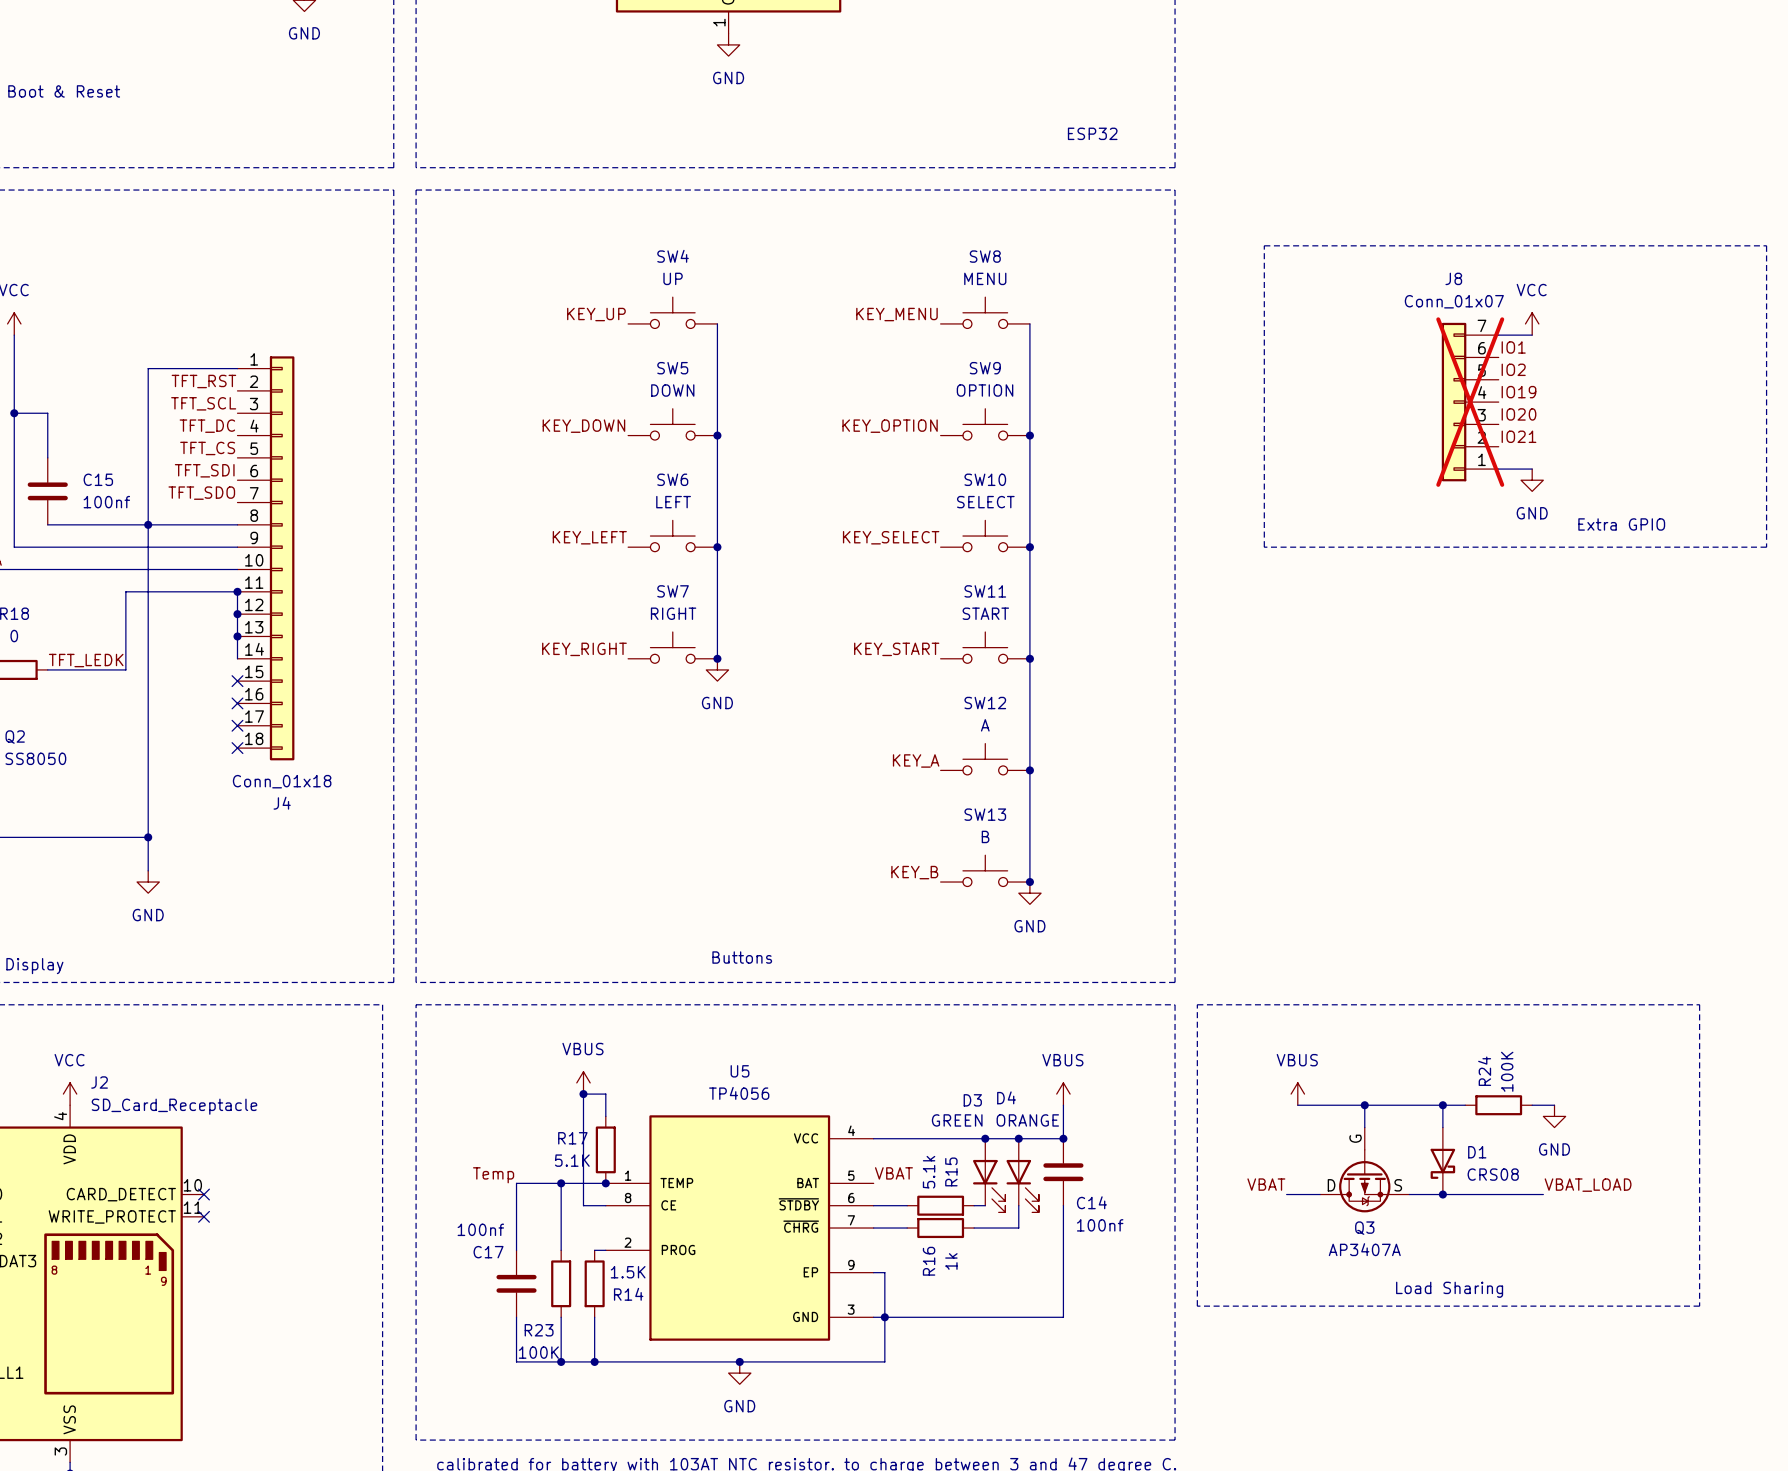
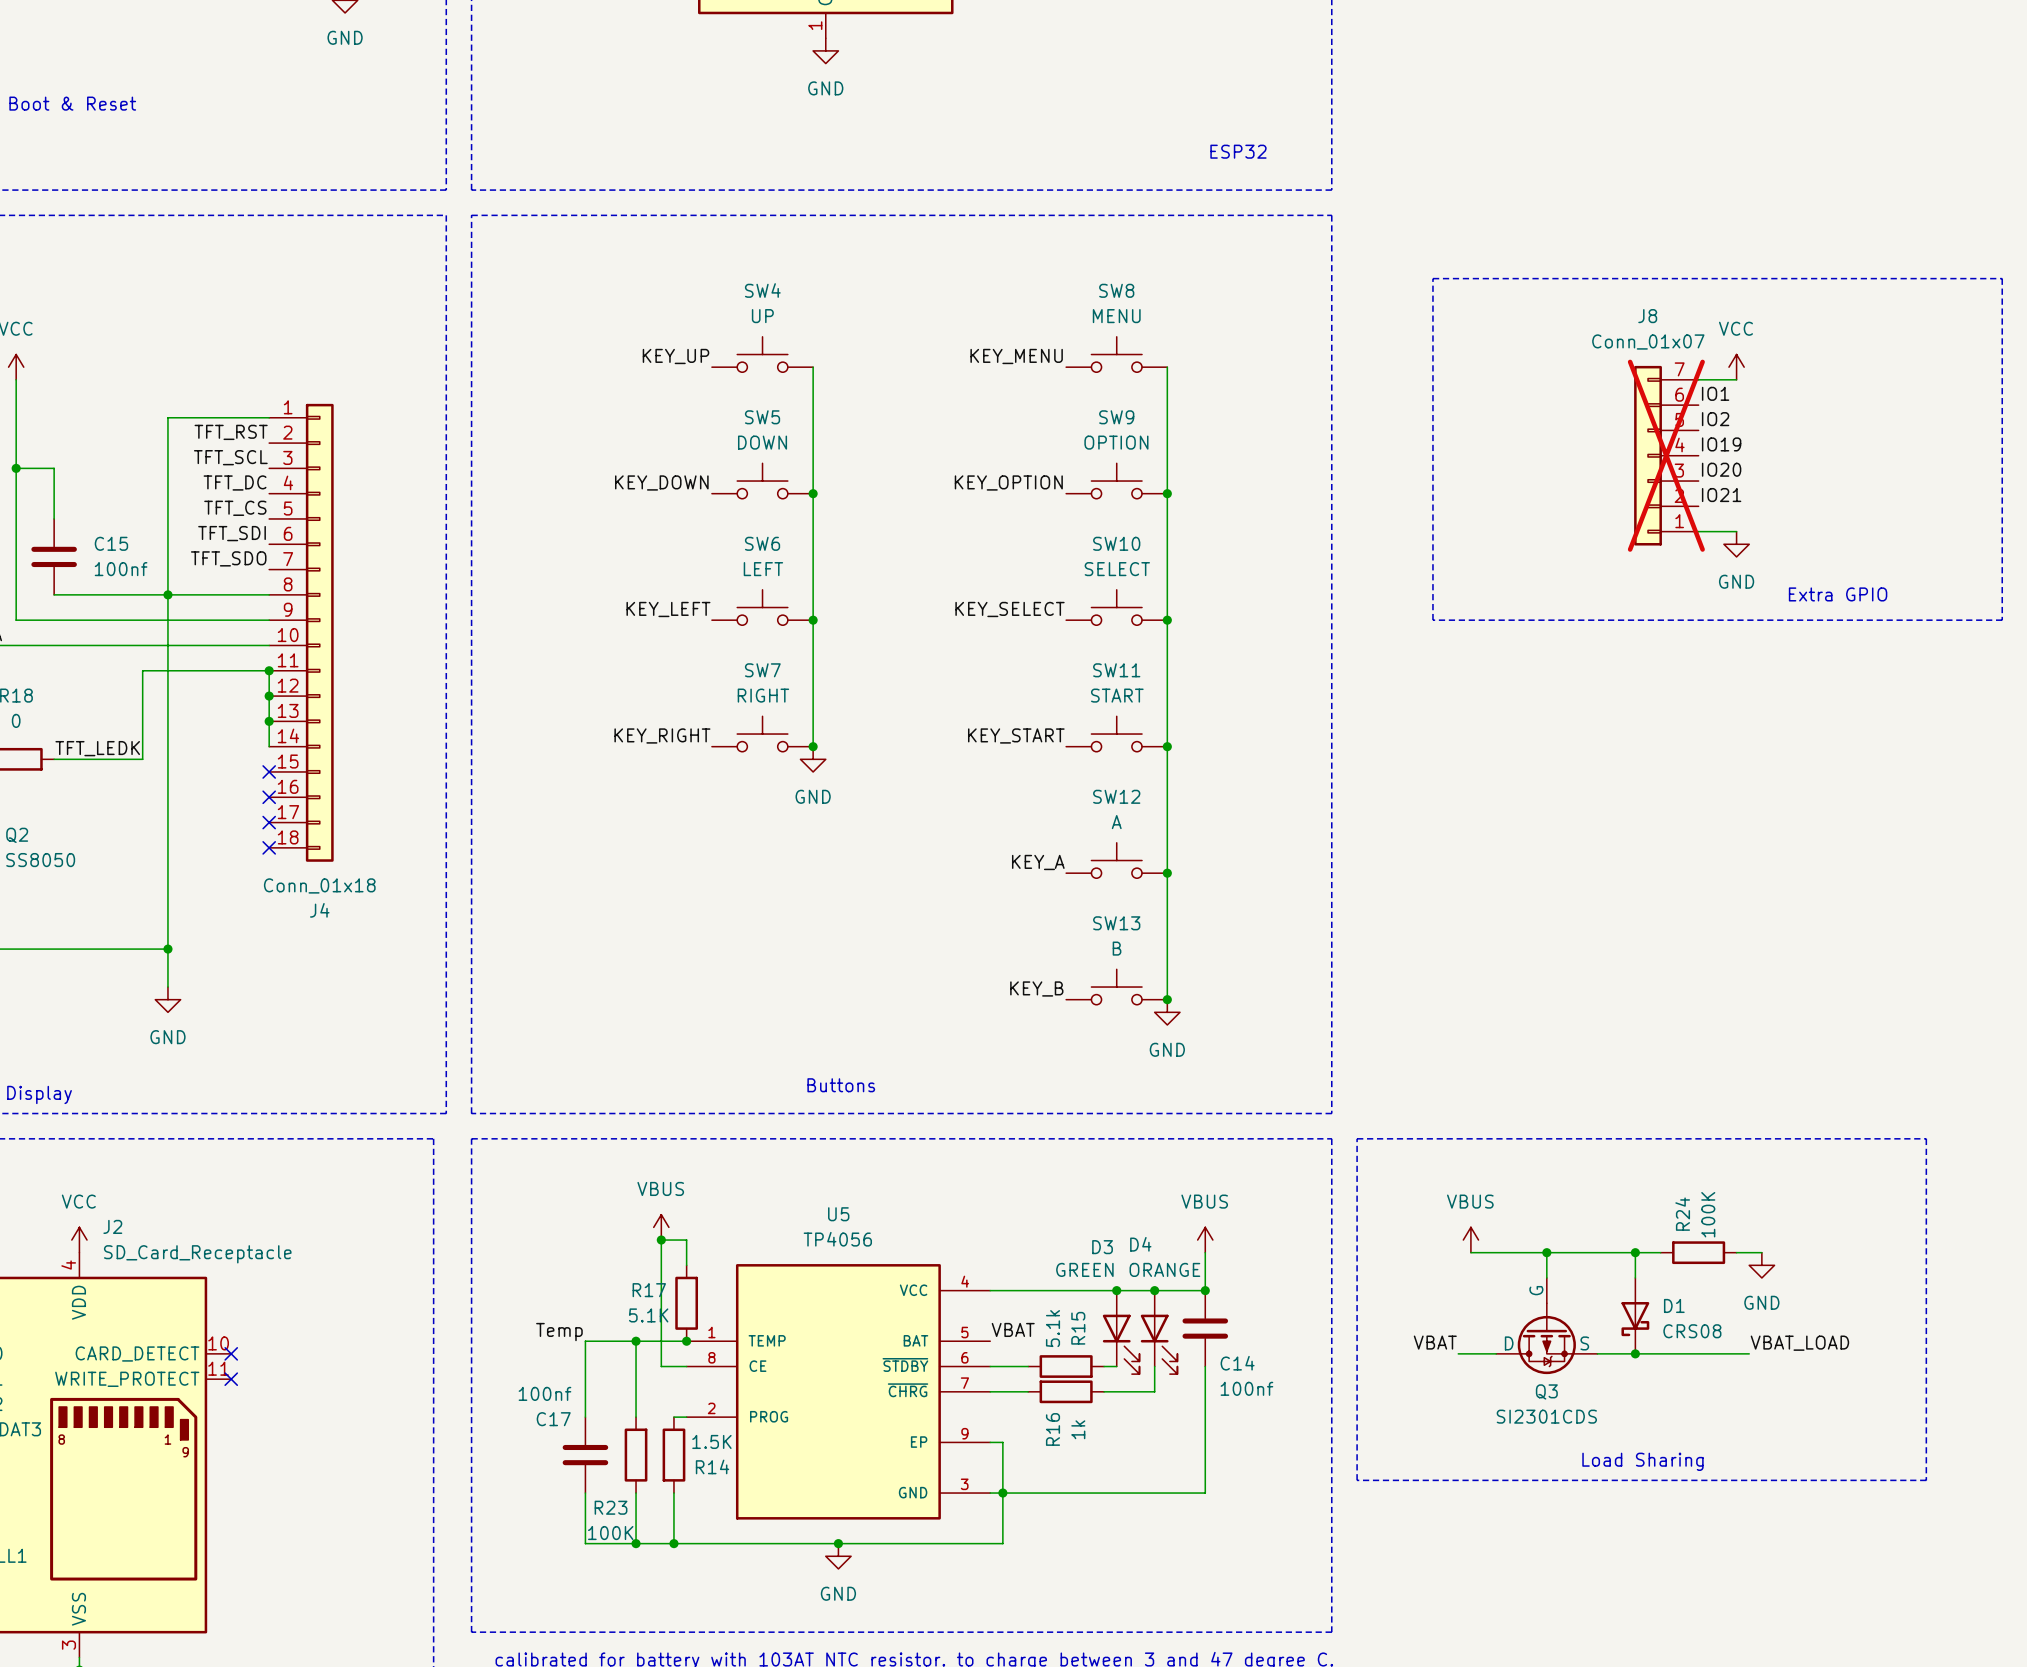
Q3 value: AP3407A (1364, 1249) -> SI2301CDS (1546, 1416)

